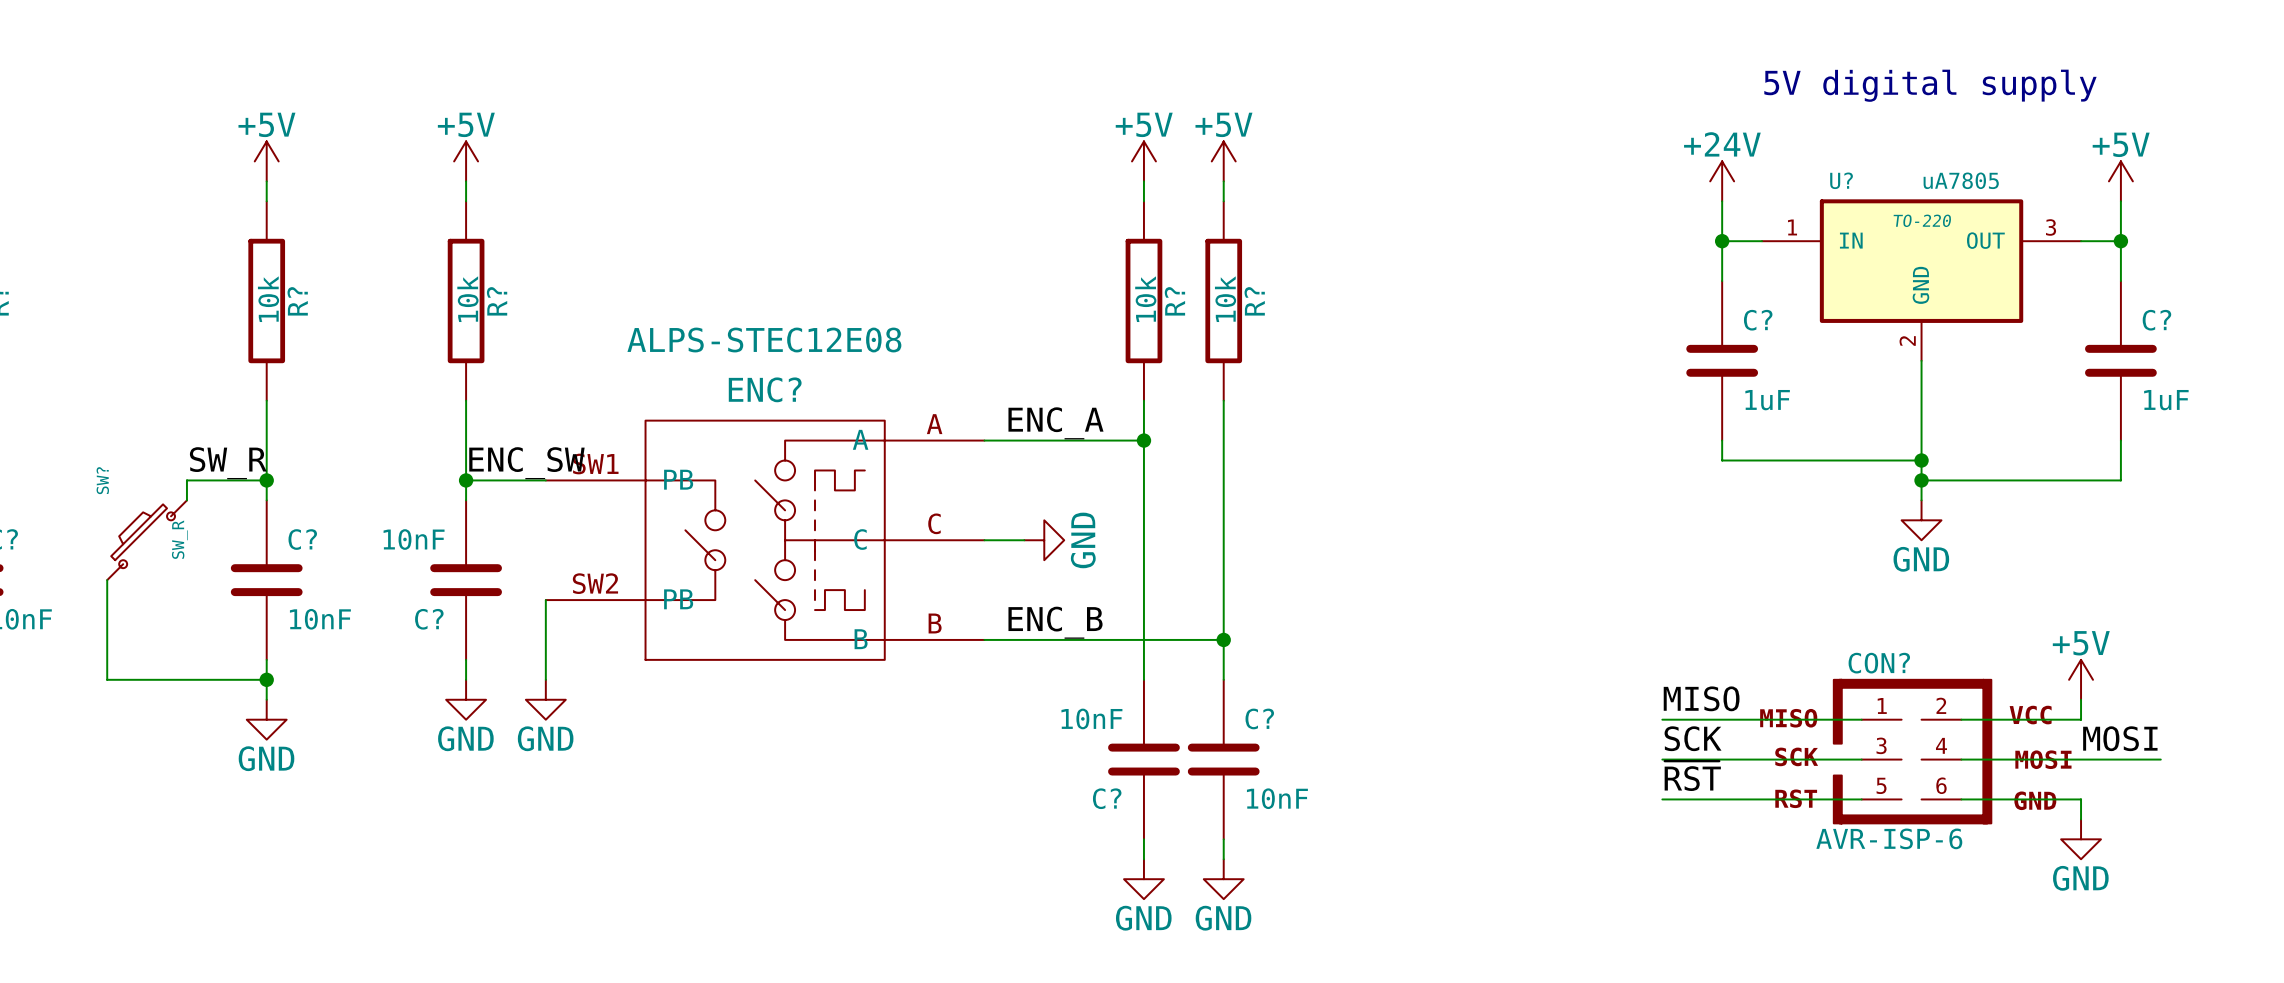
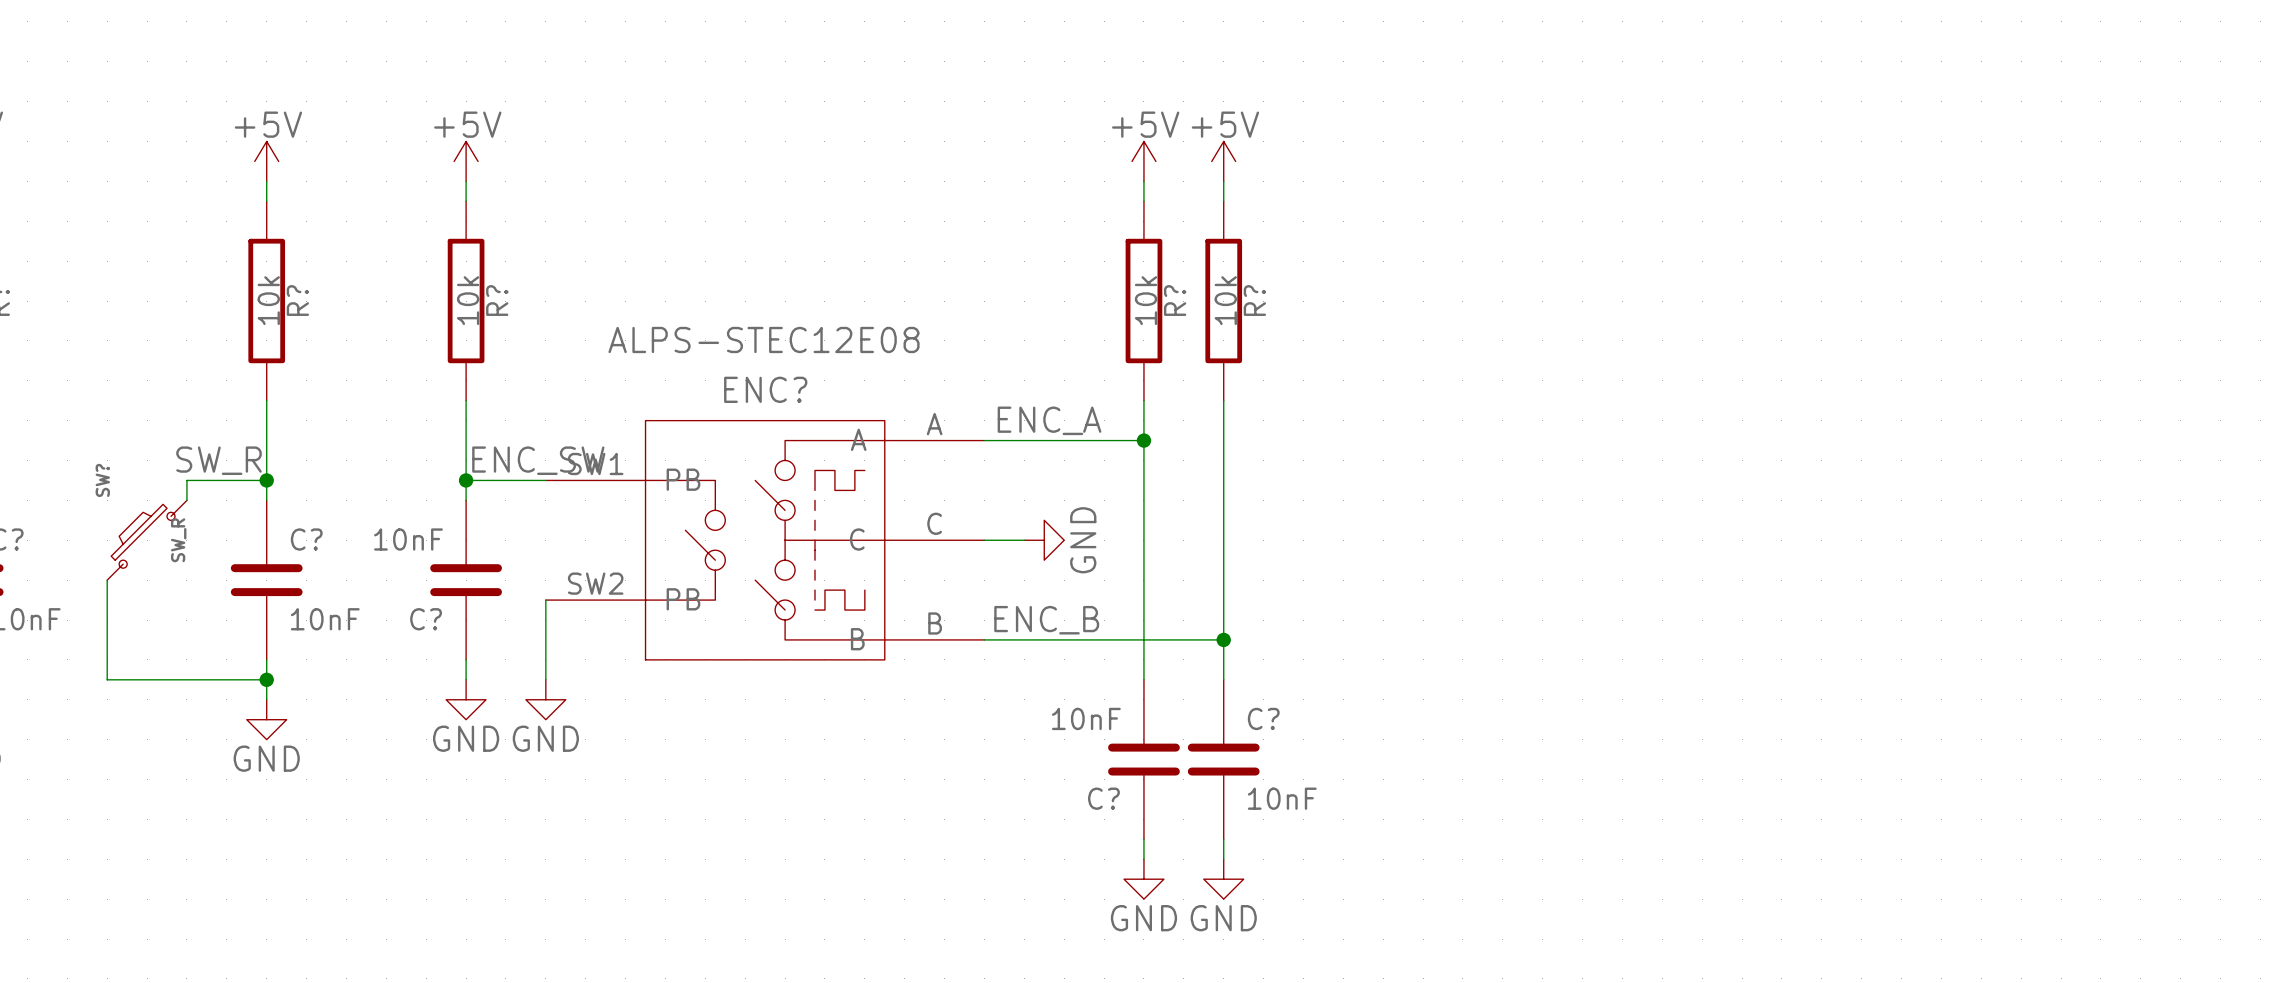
text: 5V digital supply (1930, 85) -> none
power symbol: +24V (1722, 181) -> none
power symbol: +5V (2120, 181) -> none
wire: (1722, 201) (1722, 281) -> none
wire: (2120, 201) (2120, 281) -> none
wire: (1722, 241) (1762, 241) -> none
junction: (1722, 241) -> none
wire: (2081, 241) (2120, 241) -> none
junction: (2120, 241) -> none
U?: uA7805 (1921, 280) -> none
C?: 1uF (1722, 360) -> none
wire: (1921, 360) (1921, 500) -> none
C?: 1uF (2120, 360) -> none
wire: (1722, 440) (1722, 460) (1921, 460) -> none
wire: (2120, 440) (2120, 480) (1921, 480) -> none
junction: (1921, 460) -> none
junction: (1921, 480) -> none
power symbol: GND (1921, 520) -> none
power symbol: +5V (2081, 679) -> none
label: MISO (1701, 698) -> none
wire: (2081, 699) (2081, 719) (1961, 719) -> none
wire: (1662, 719) (1861, 719) -> none
label: SCK (1693, 738) -> none
label: MOSI (2120, 738) -> none
CON?: AVR-ISP-6 (1912, 751) -> none
wire: (1662, 759) (1861, 759) -> none
wire: (1961, 759) (2160, 759) -> none
label: ~{RST} (1692, 776) -> none
wire: (1662, 799) (1861, 799) -> none
wire: (1961, 799) (2081, 799) (2081, 819) -> none
power symbol: GND (2081, 839) -> none

